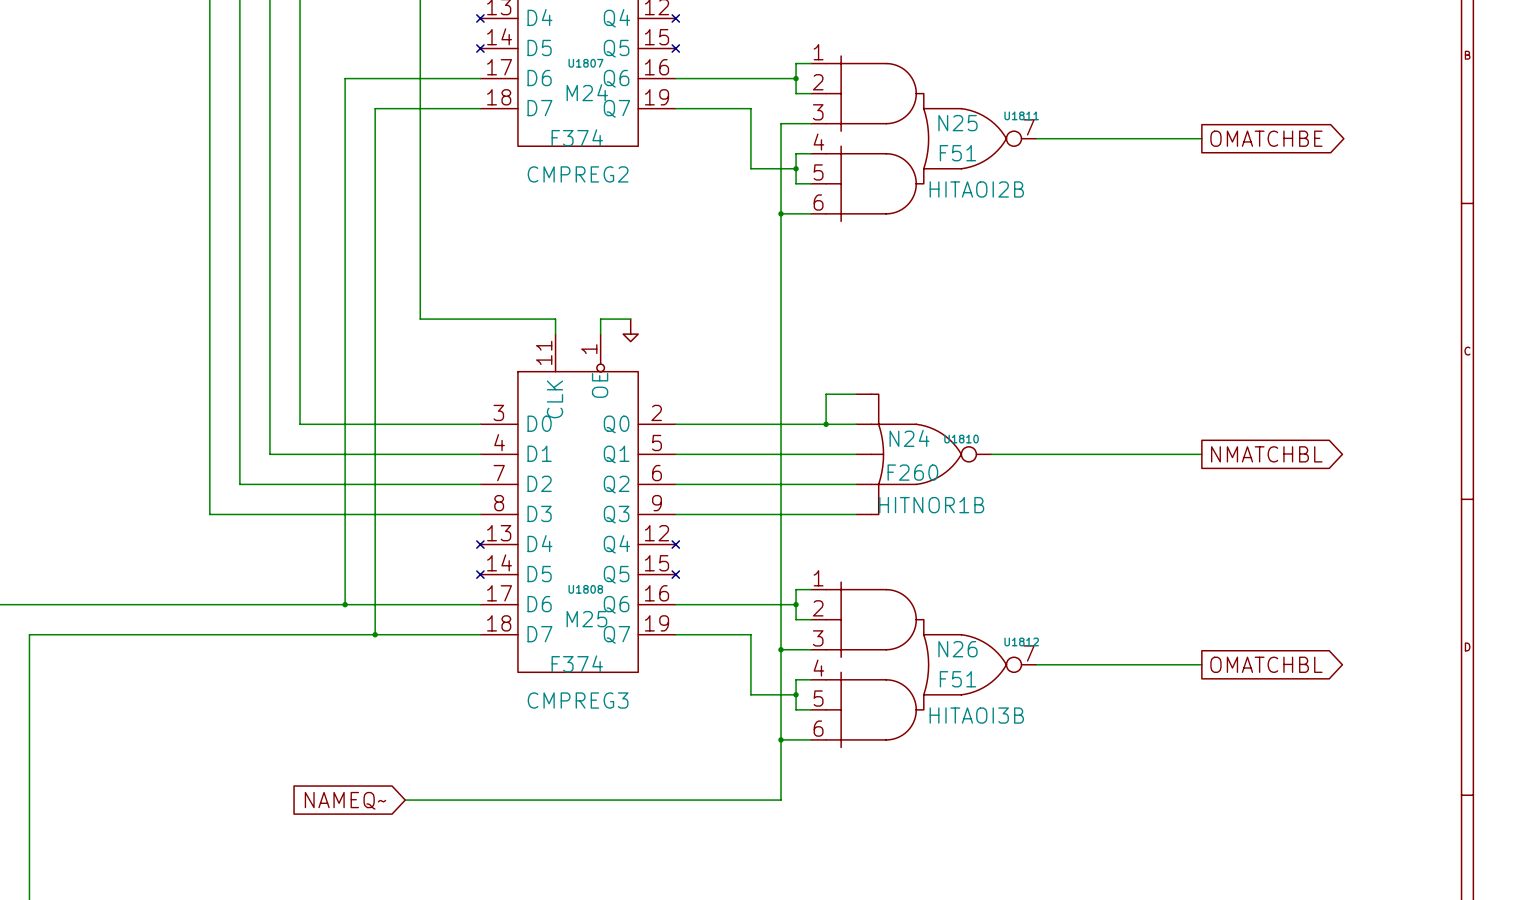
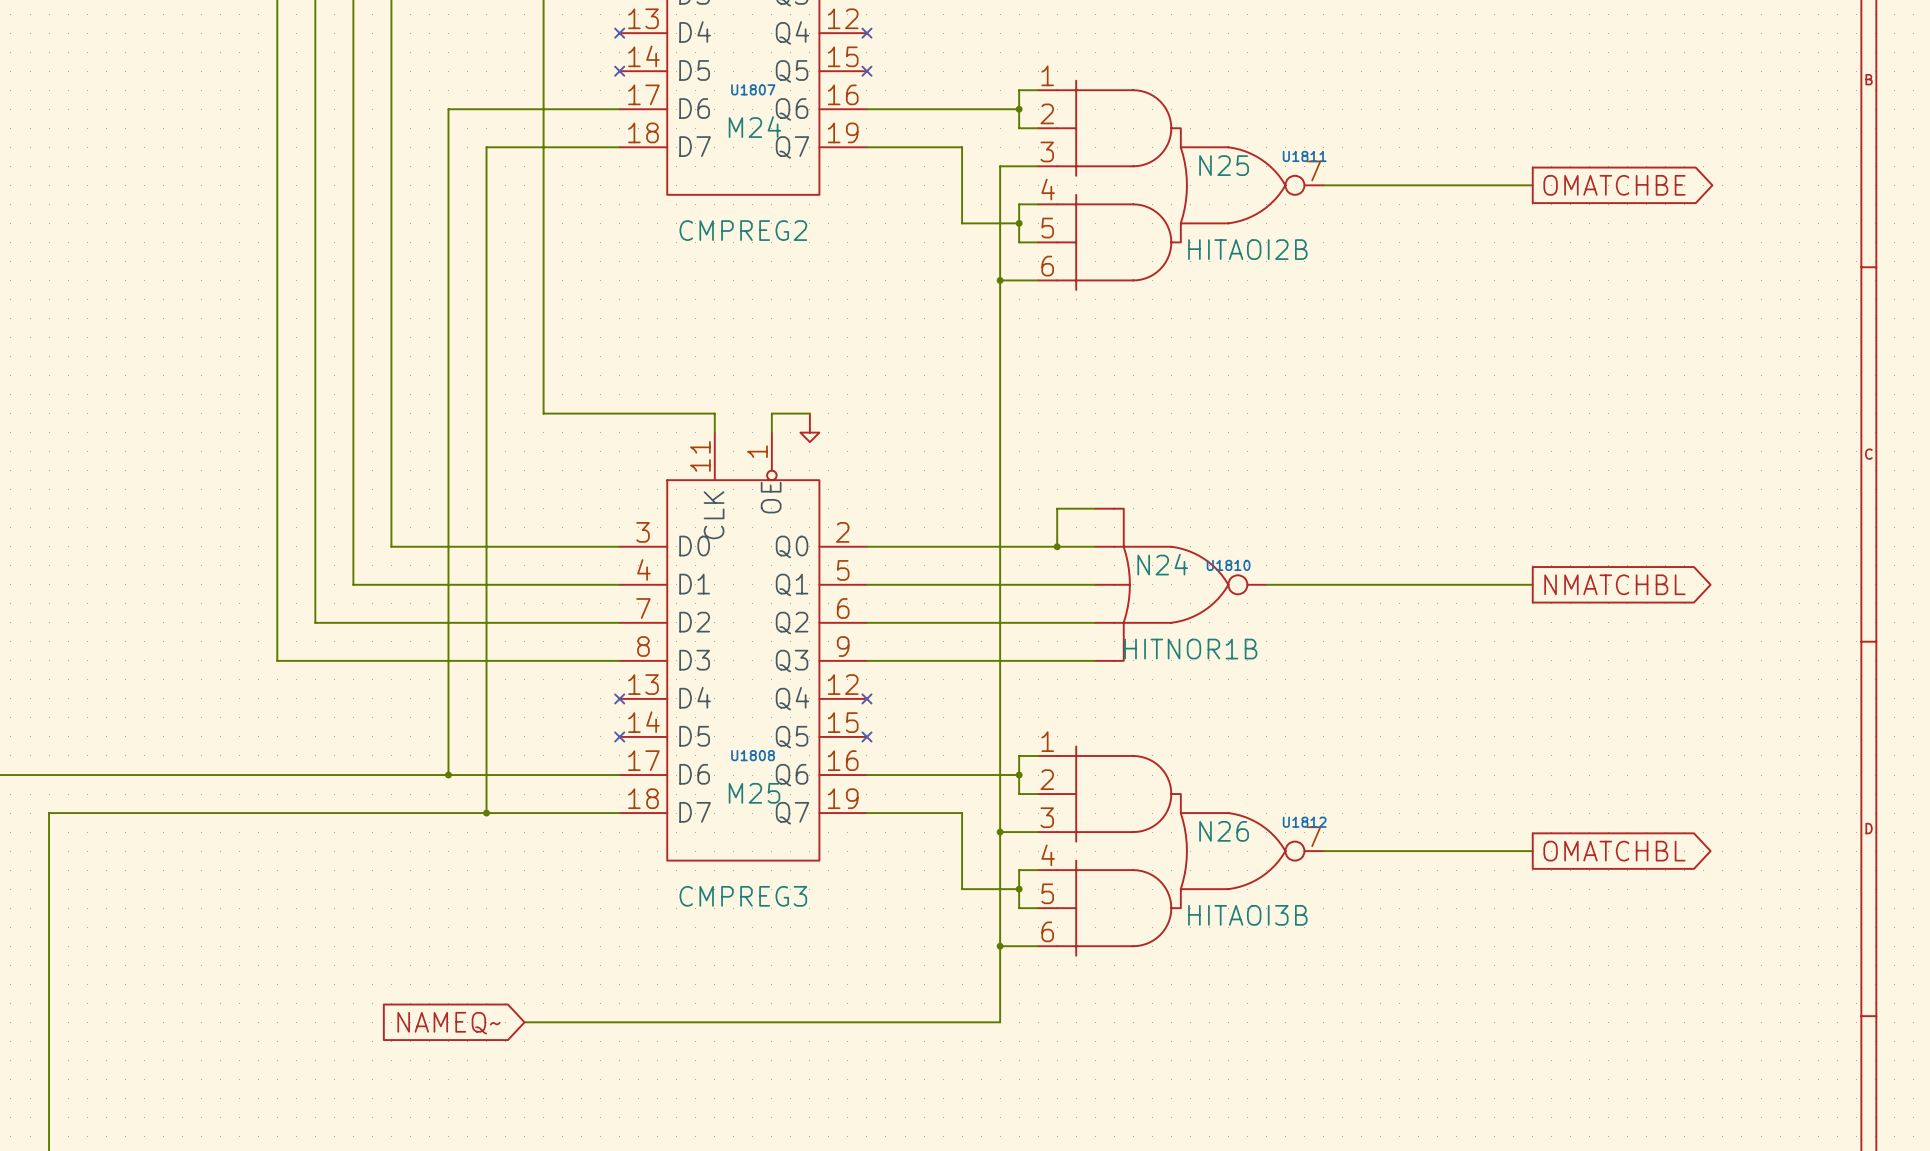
U1807 value: F374 (577, 137) -> none
U1811 value: F51 (957, 153) -> none
U1810 value: F260 (912, 472) -> none
U1808 value: F374 (577, 663) -> none
U1812 value: F51 (957, 679) -> none

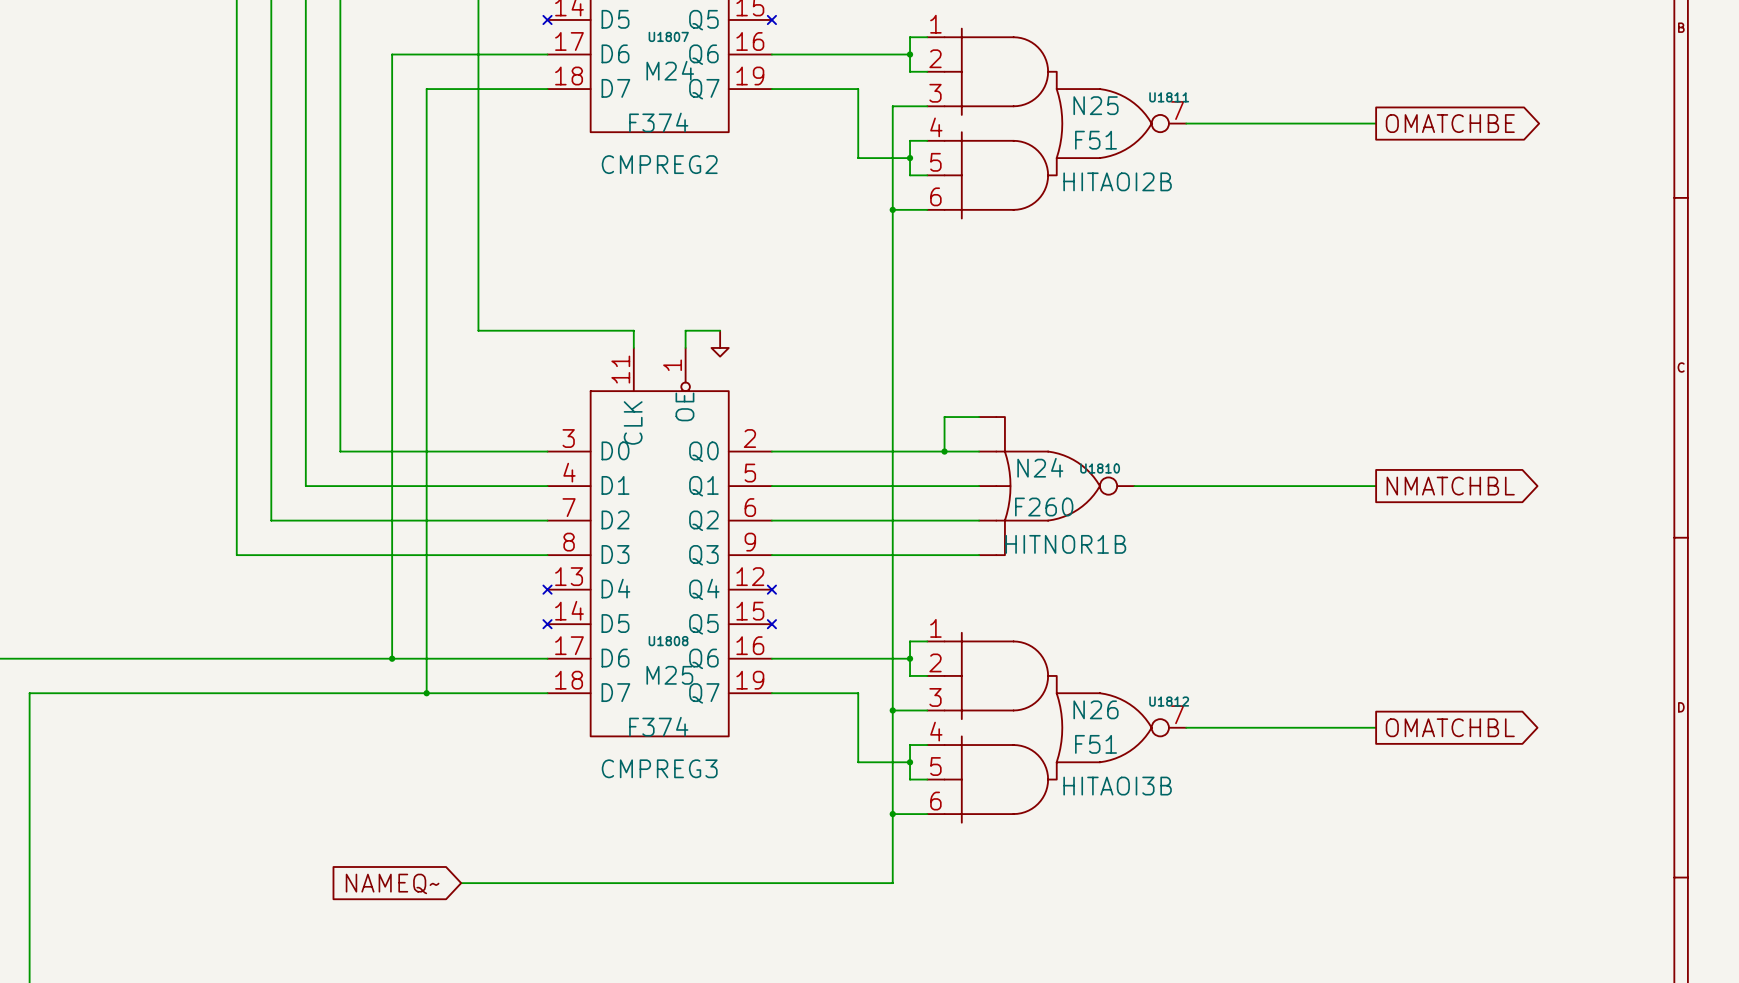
U1807 value: none -> F374 (658, 122)
U1811 value: none -> F51 (1096, 140)
U1810 value: none -> F260 (1044, 507)
U1808 value: none -> F374 (658, 726)
U1812 value: none -> F51 (1096, 744)

